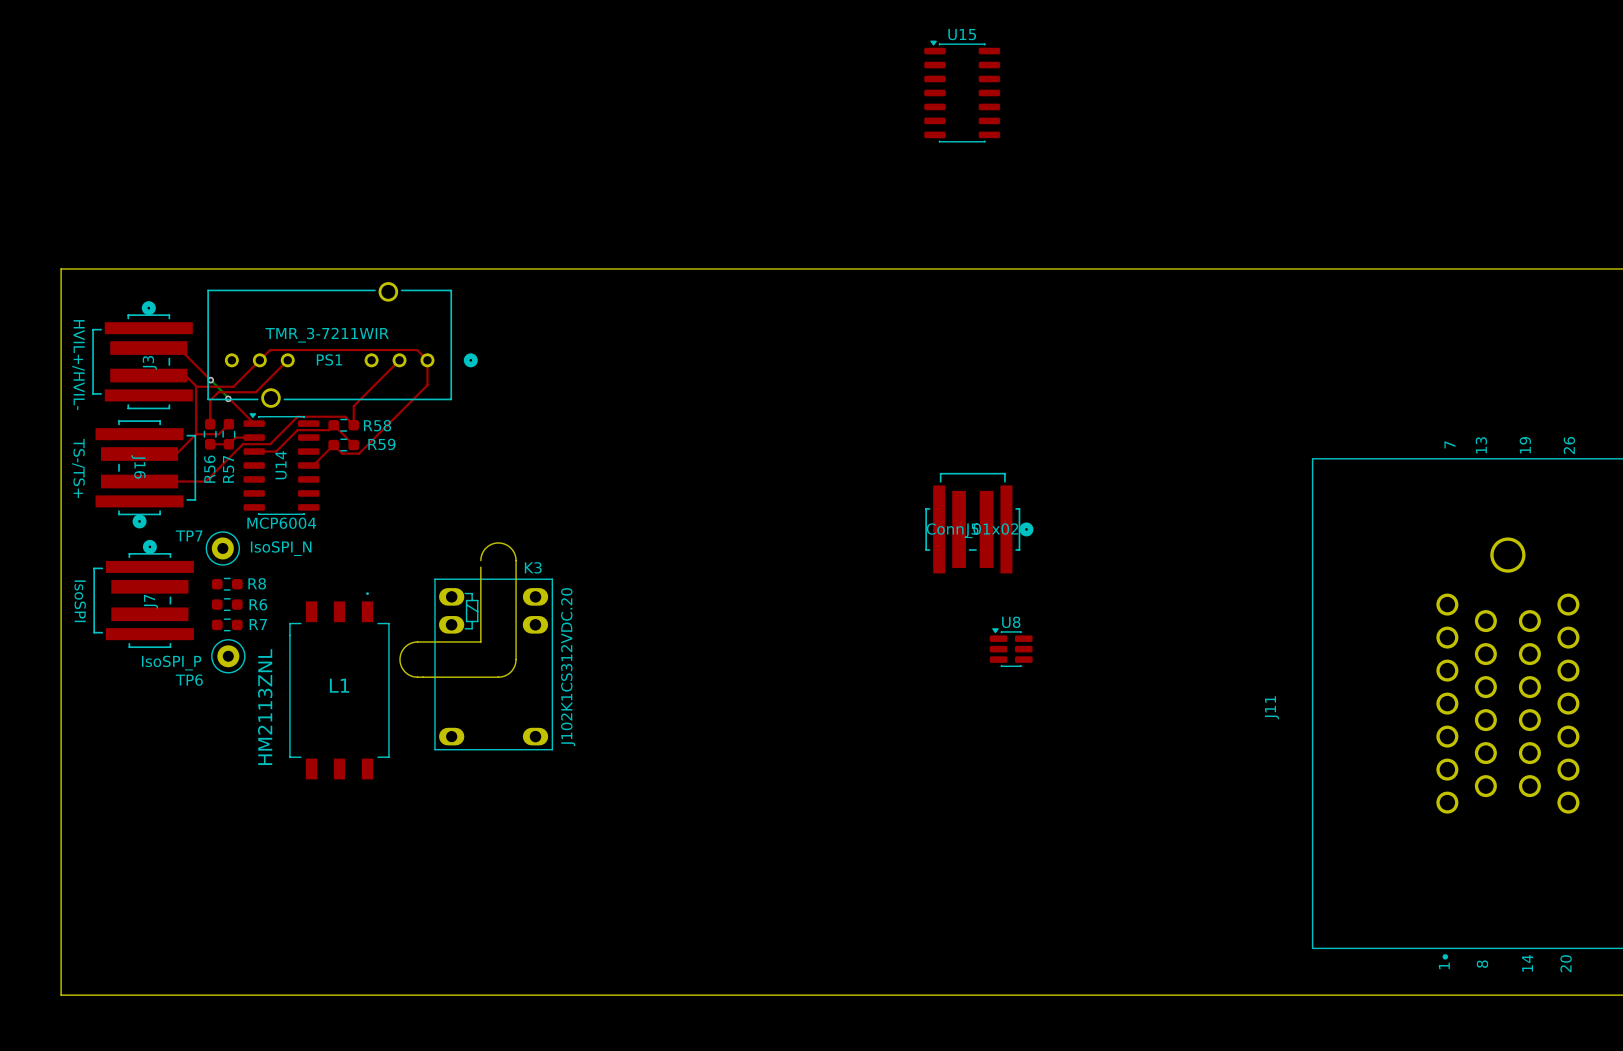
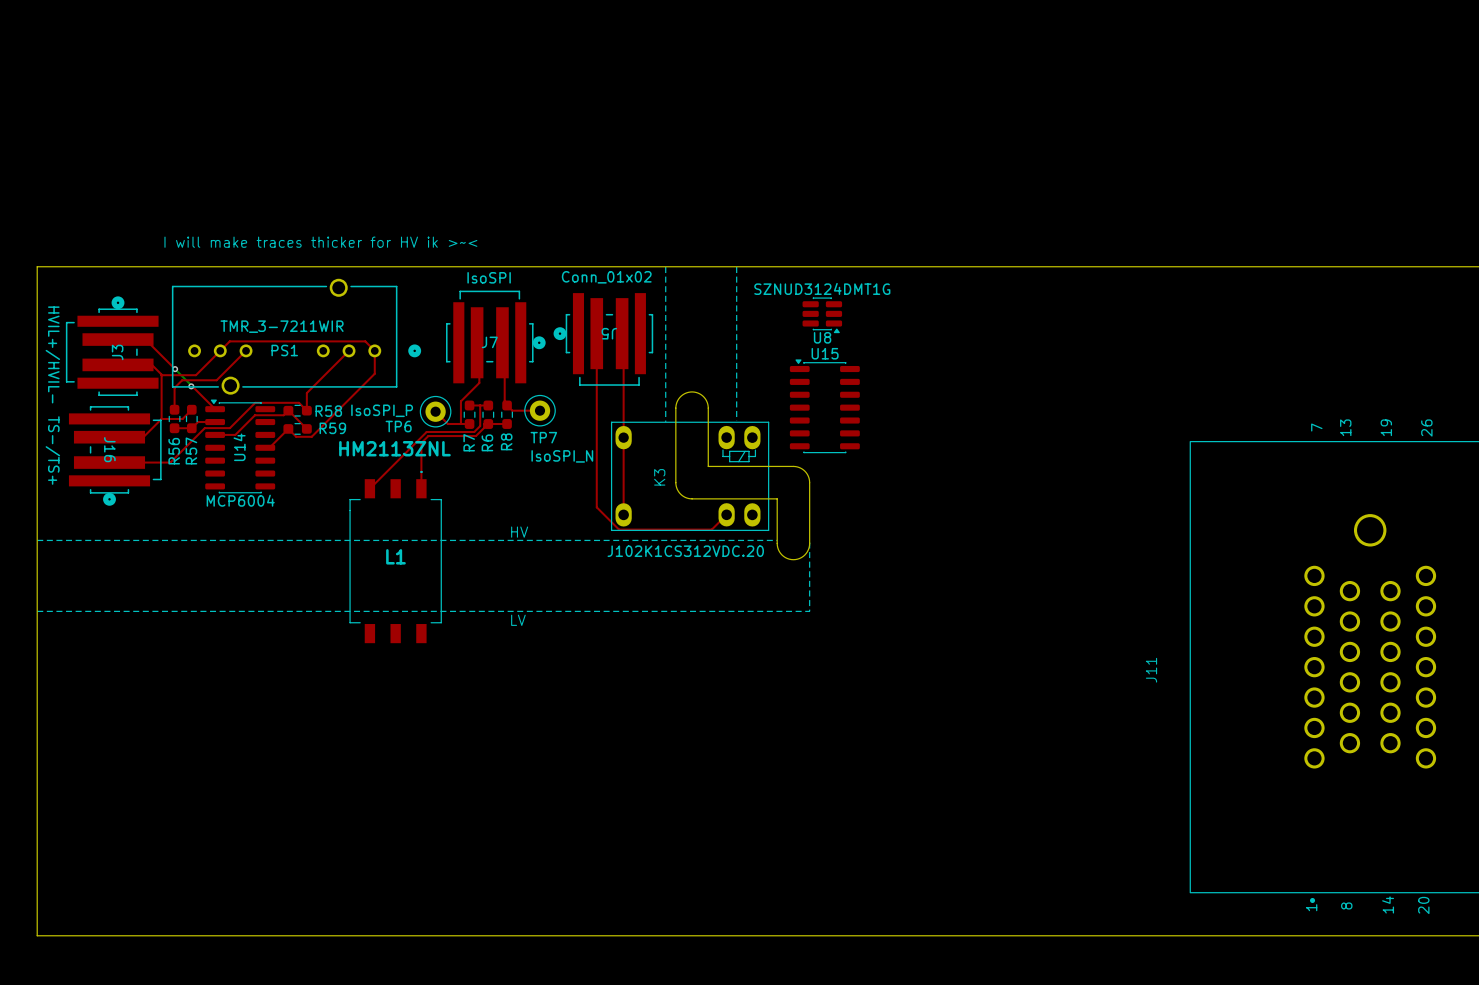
U15 position: (962, 91) -> (824, 406)
text: none -> I will make traces thicker for HV ik >~< (320, 242)
line: none -> (665, 267) (665, 421)
line: none -> (736, 267) (736, 420)
U8 value: none -> SZNUD3124DMT1G (822, 288)
top track: none -> (596, 333) (596, 507) (619, 529) (711, 529) (726, 514)
top track: none -> (622, 333) (623, 514)
top track: none -> (479, 343) (479, 382) (460, 401) (460, 423)
top track: none -> (504, 343) (504, 400) (507, 405) (512, 410) (540, 410)
top track: none -> (469, 405) (488, 405)
top track: none -> (480, 405) (480, 426) (474, 431) (426, 431) (369, 488)
board edge: none -> (675, 408) (675, 482) (679, 492) (690, 498) (777, 498) (778, 549) (781, 554) (789, 559) (797, 559) (803, 556) (808, 549) (809, 543) (809, 482) (806, 472) (795, 466) (708, 466) (708, 408) (706, 400) (699, 393) (688, 392) (679, 397) (675, 408)
top track: none -> (435, 411) (447, 423) (469, 423)
top track: none -> (507, 423) (484, 423) (484, 427) (475, 436) (428, 436) (421, 442) (421, 488)
J5 rotation: 0° (979, 523) -> 180° (603, 339)
J5 position: (979, 523) -> (603, 339)
J5 value position: Conn_01x02 (972, 530) -> Conn_01x02 (606, 277)
TP7 name position: TP7 (189, 535) -> TP7 (543, 437)
TP7 position: (222, 548) -> (540, 410)
TP7 value position: IsoSPI_N (281, 548) -> IsoSPI_N (562, 456)
text: none -> HV (519, 532)
board edge: (480, 560) (485, 548) (496, 543) (508, 546) (515, 556) (516, 659) (513, 668) (507, 674) (498, 677) (417, 677) (407, 674) (401, 665) (400, 657) (403, 649) (411, 643) (480, 641) (480, 567) -> none
line: none -> (37, 540) (777, 540)
K3 name position: K3 (533, 567) -> K3 (659, 477)
line: none -> (809, 542) (809, 611) (37, 611)
R8 rotation: 0° (227, 584) -> 90° clockwise (507, 414)
R8 position: (227, 584) -> (507, 414)
J7 rotation: 0° (143, 593) -> 90° clockwise (495, 336)
J7 position: (143, 593) -> (495, 336)
R6 rotation: 0° (227, 604) -> 90° clockwise (488, 414)
R6 position: (227, 604) -> (488, 414)
R7 rotation: 0° (227, 624) -> 90° clockwise (469, 414)
R7 position: (227, 624) -> (469, 414)
U8 rotation: 0° (1011, 647) -> 180° (822, 315)
U8 position: (1011, 647) -> (822, 315)
text: none -> LV (518, 620)
TP6 position: (228, 656) -> (435, 411)
TP6 value position: IsoSPI_P (171, 663) -> IsoSPI_P (382, 410)
K3 rotation: 0° (493, 664) -> 90° clockwise (690, 476)
K3 position: (493, 664) -> (690, 476)
TP6 name position: TP6 (189, 680) -> TP6 (398, 426)
L1 position: (339, 685) -> (395, 557)
L1 value rotation: 0° (265, 707) -> 90° clockwise (394, 448)
L1 value position: HM2113ZNL (265, 707) -> HM2113ZNL (394, 448)

